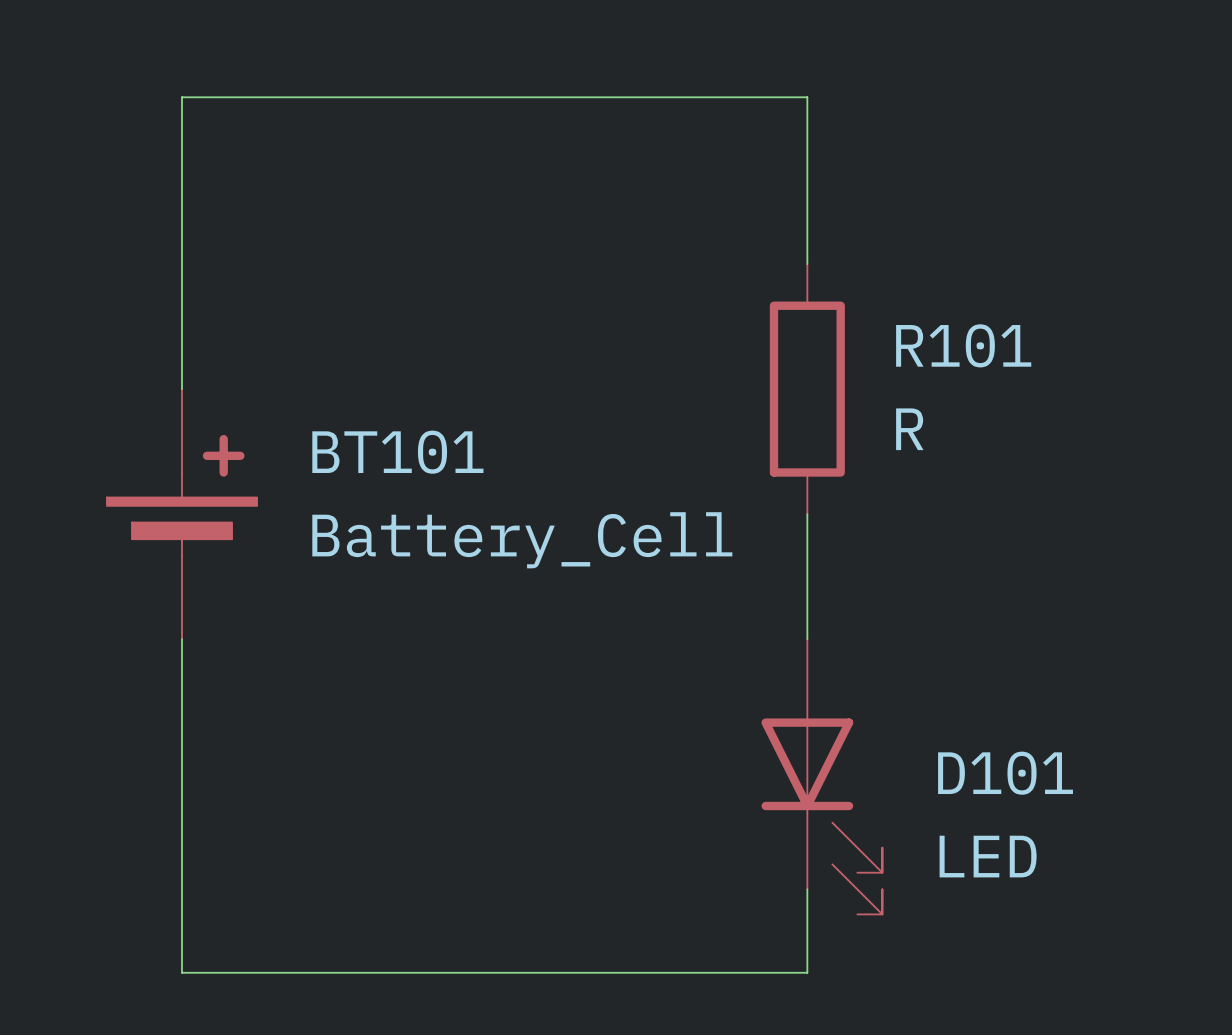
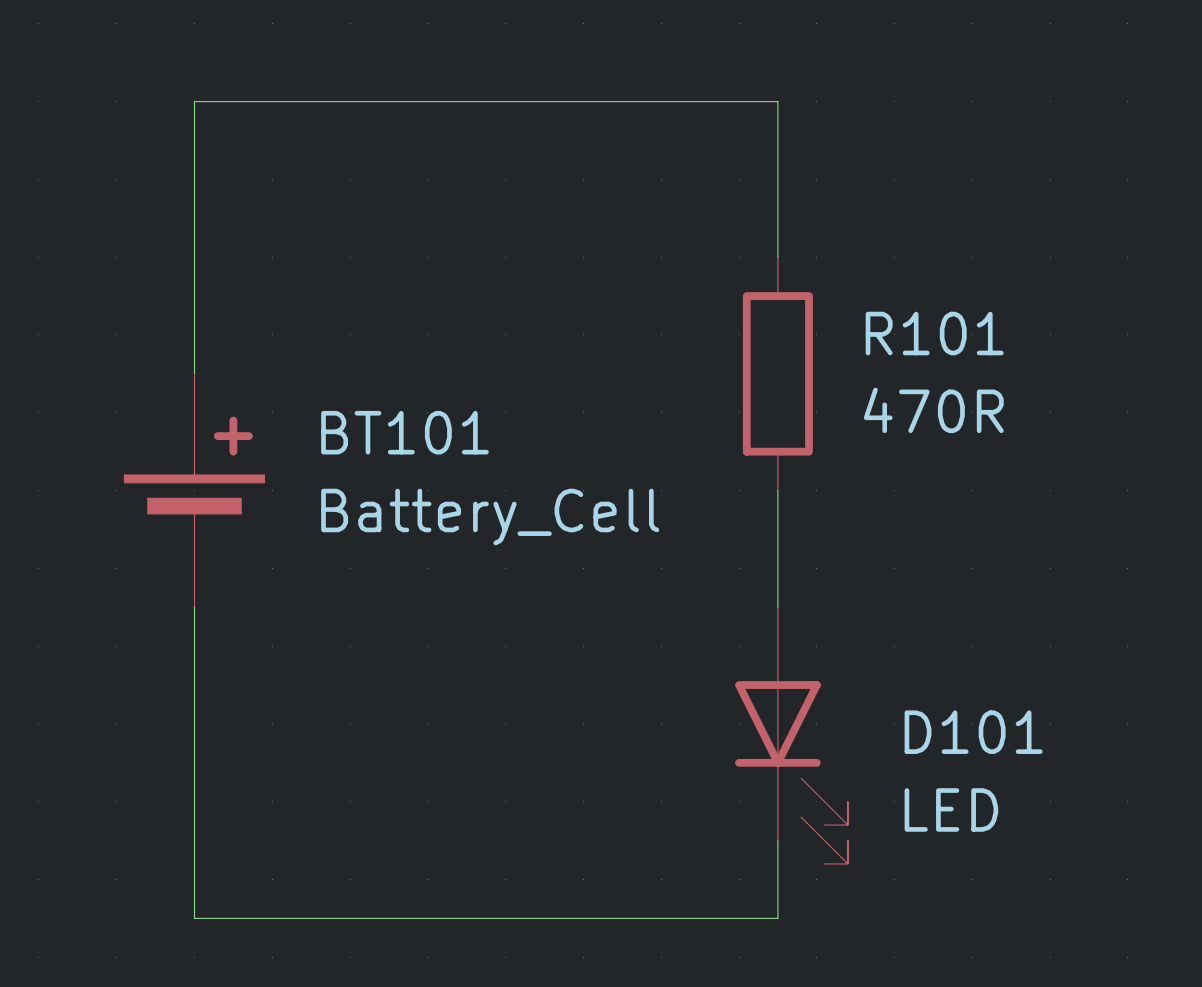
R101 value: R (909, 429) -> 470R (933, 410)

